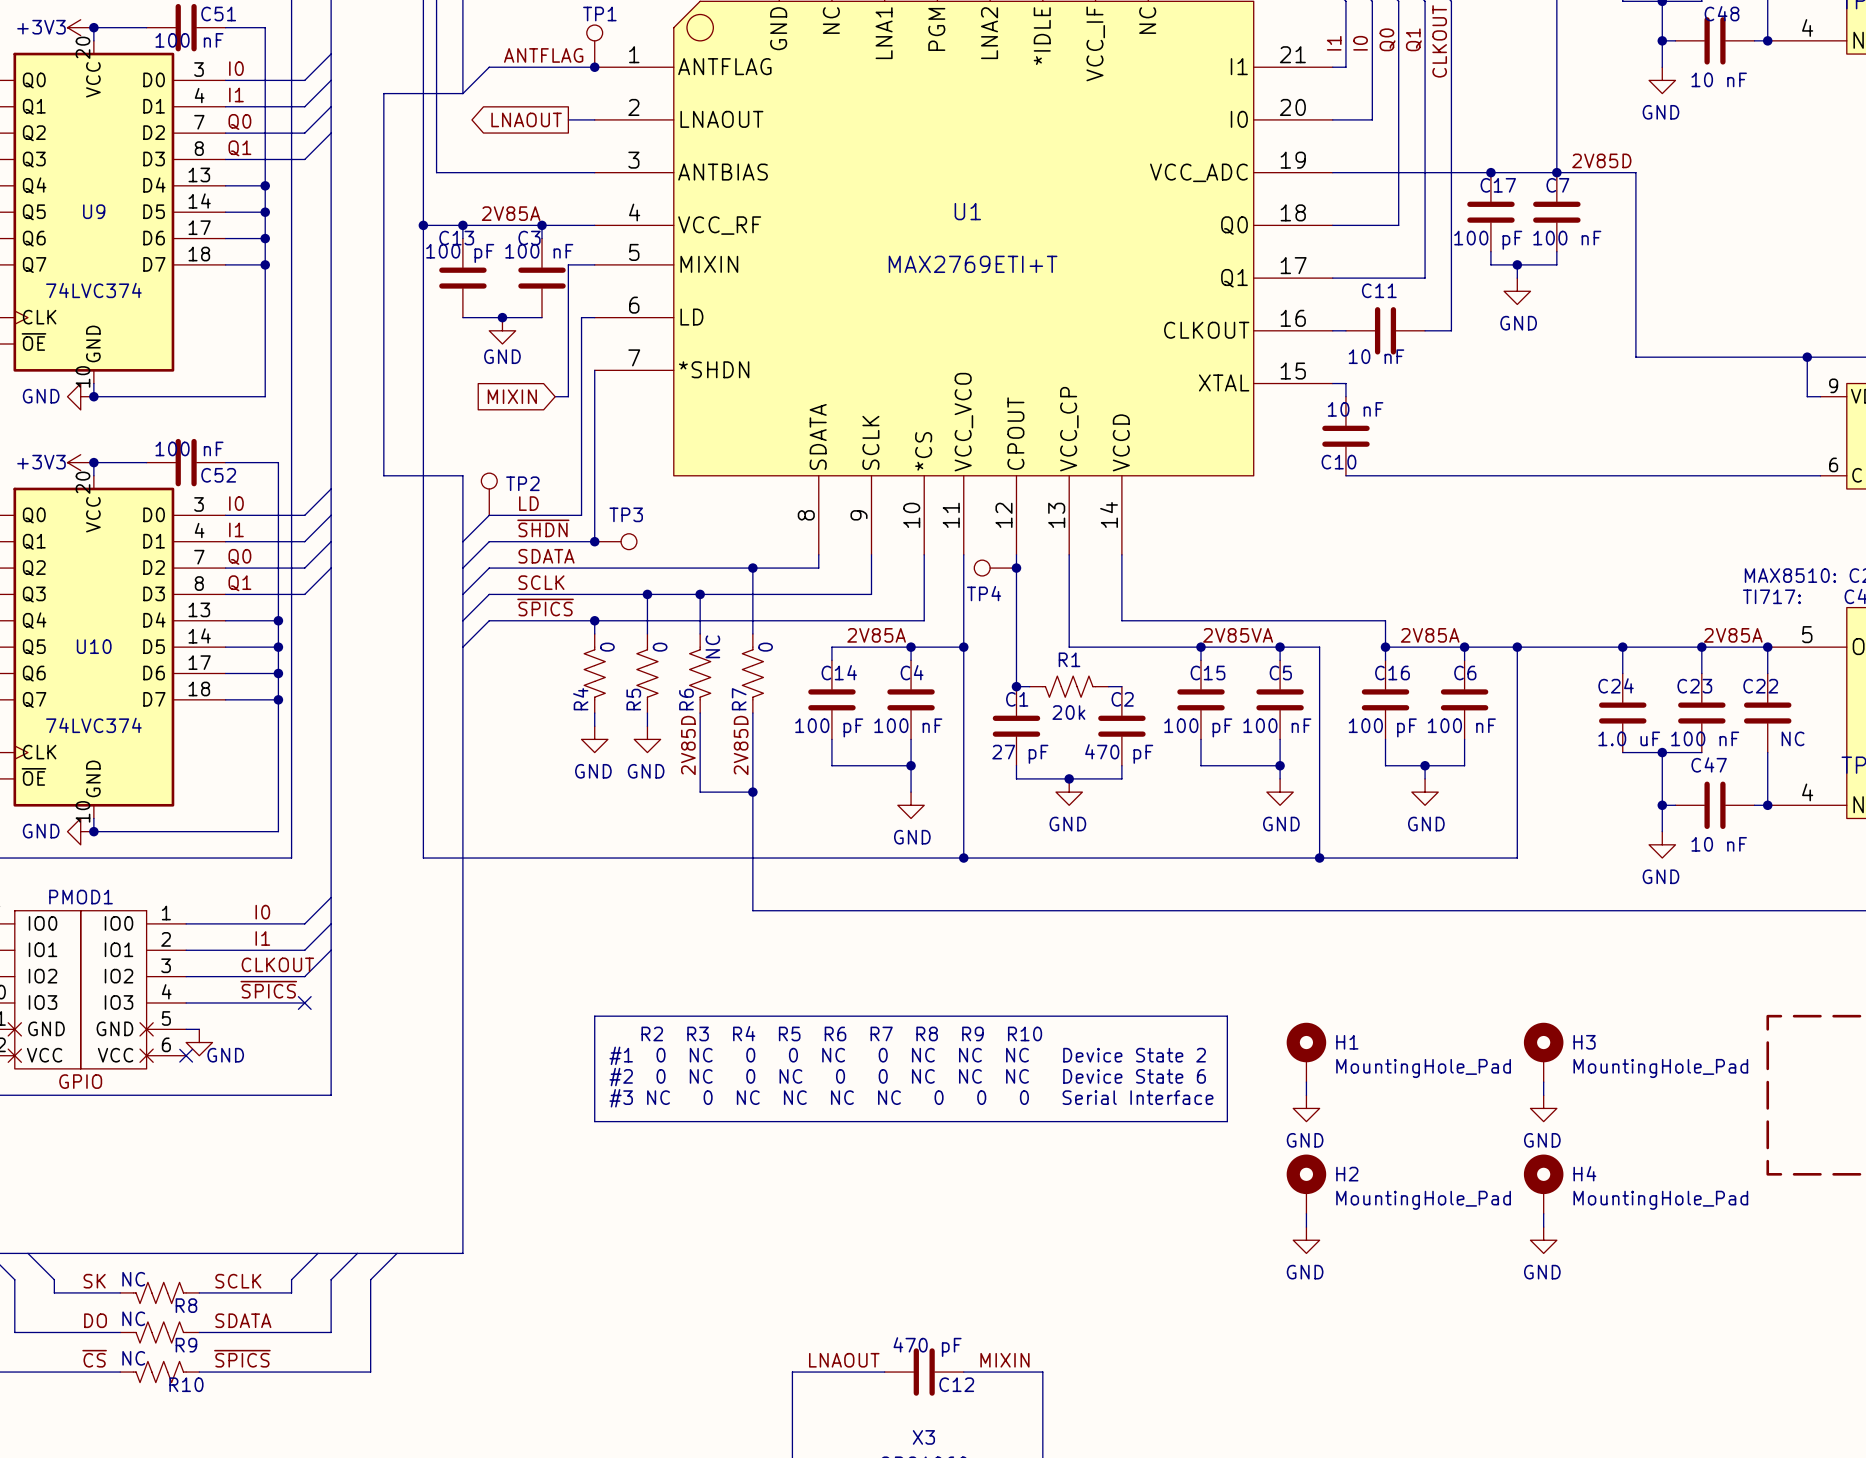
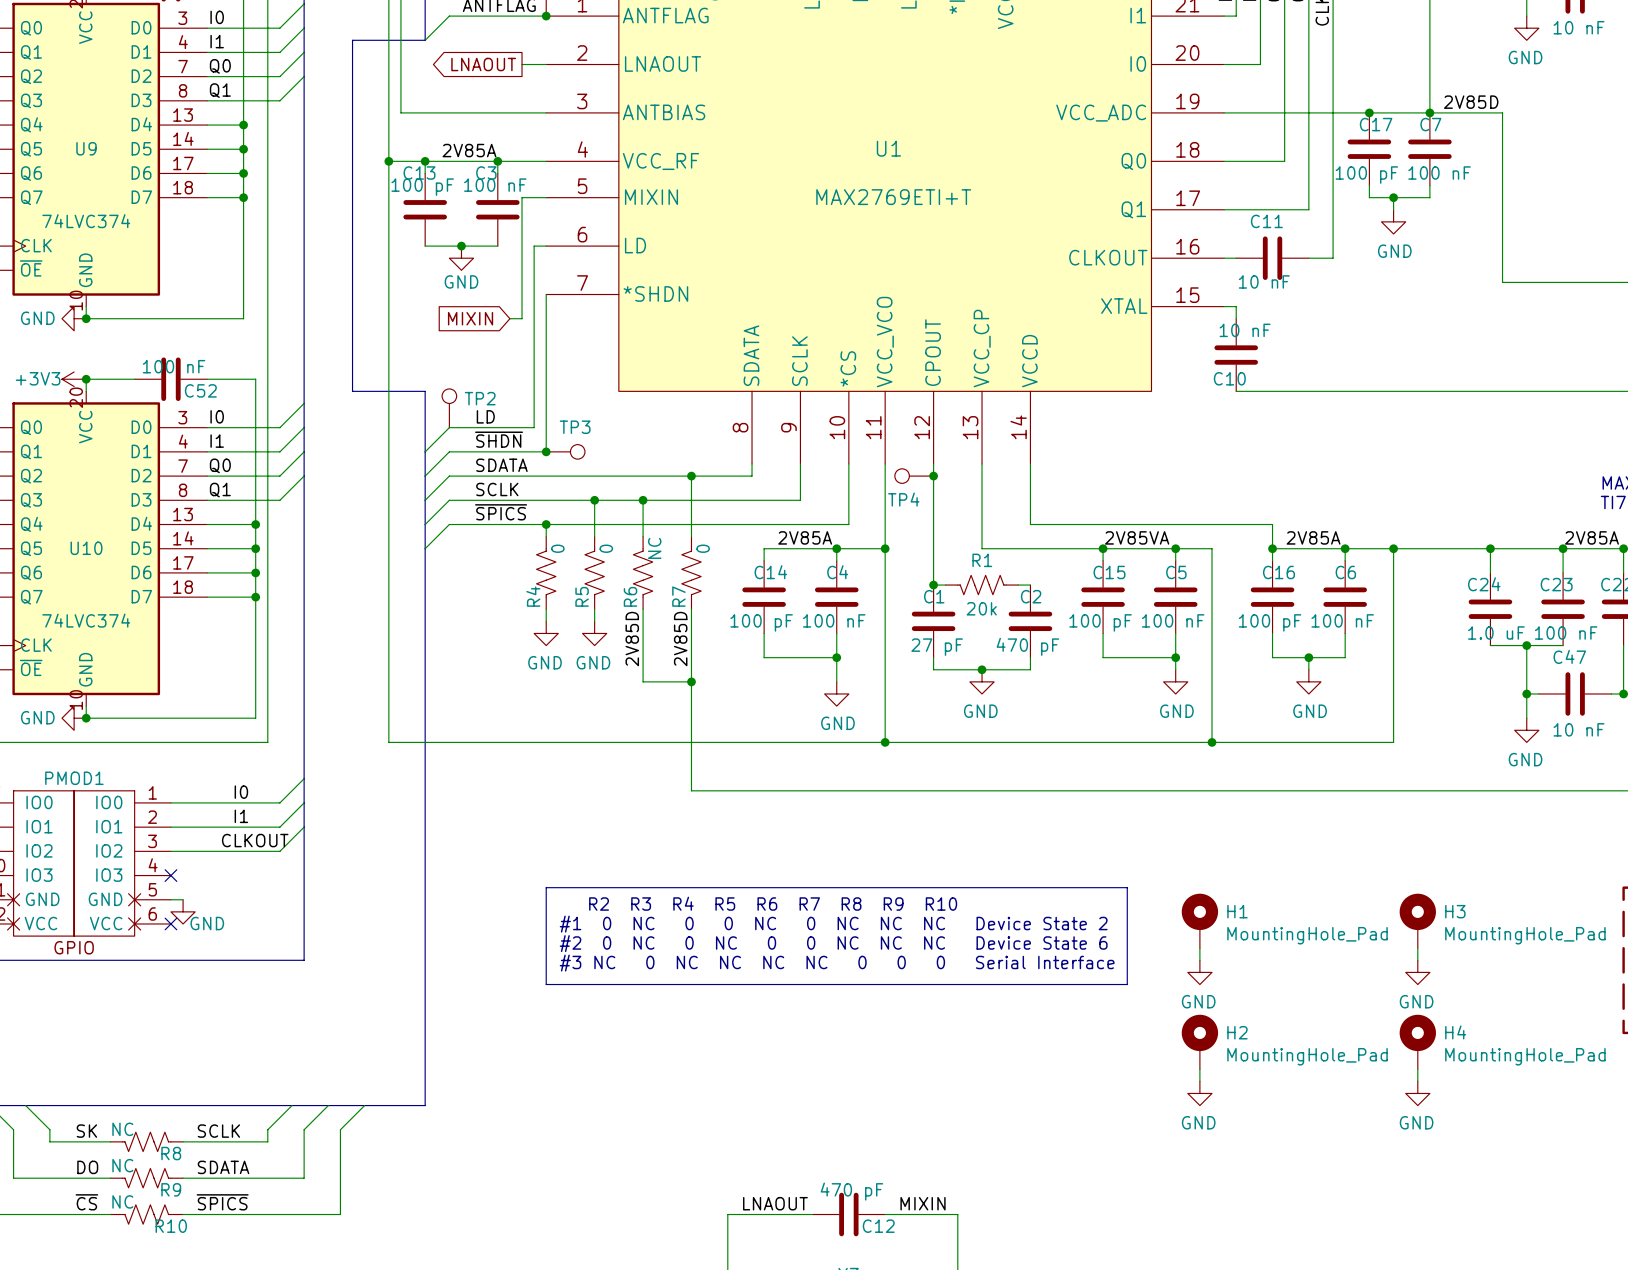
label: ~{SPICS} (268, 989) -> none
wire: (186, 1002) (304, 1002) -> none
no-connect mark: none -> (170, 875)
no-connect mark: (304, 1002) -> none

